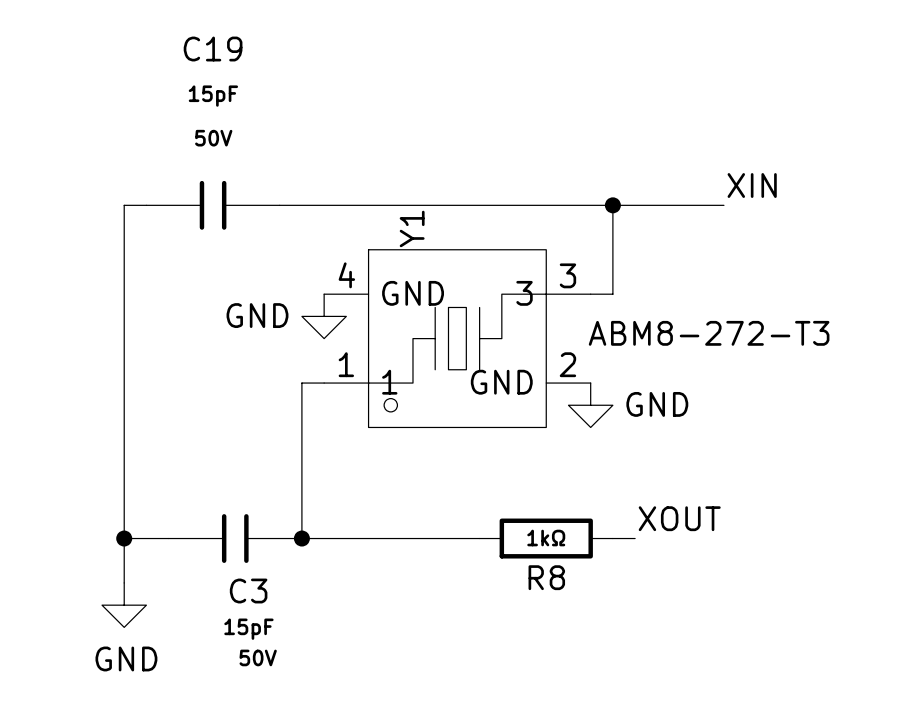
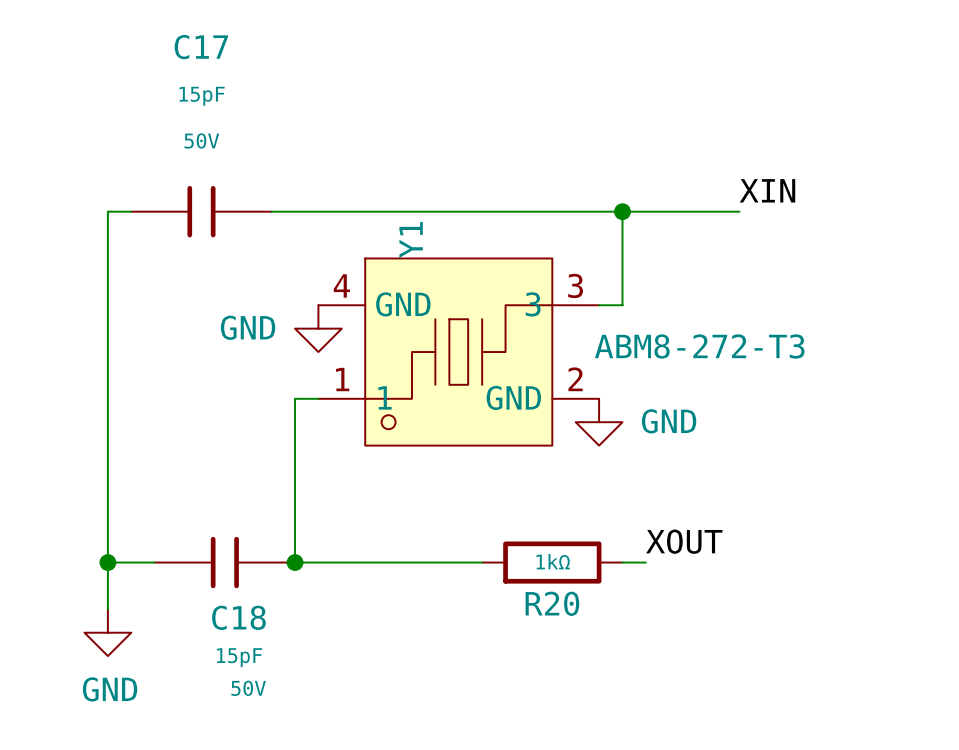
C19 name: C19 (213, 49) -> C17 (201, 47)
R8 name: R8 (546, 577) -> R20 (552, 603)
C3 name: C3 (248, 591) -> C18 (238, 617)

